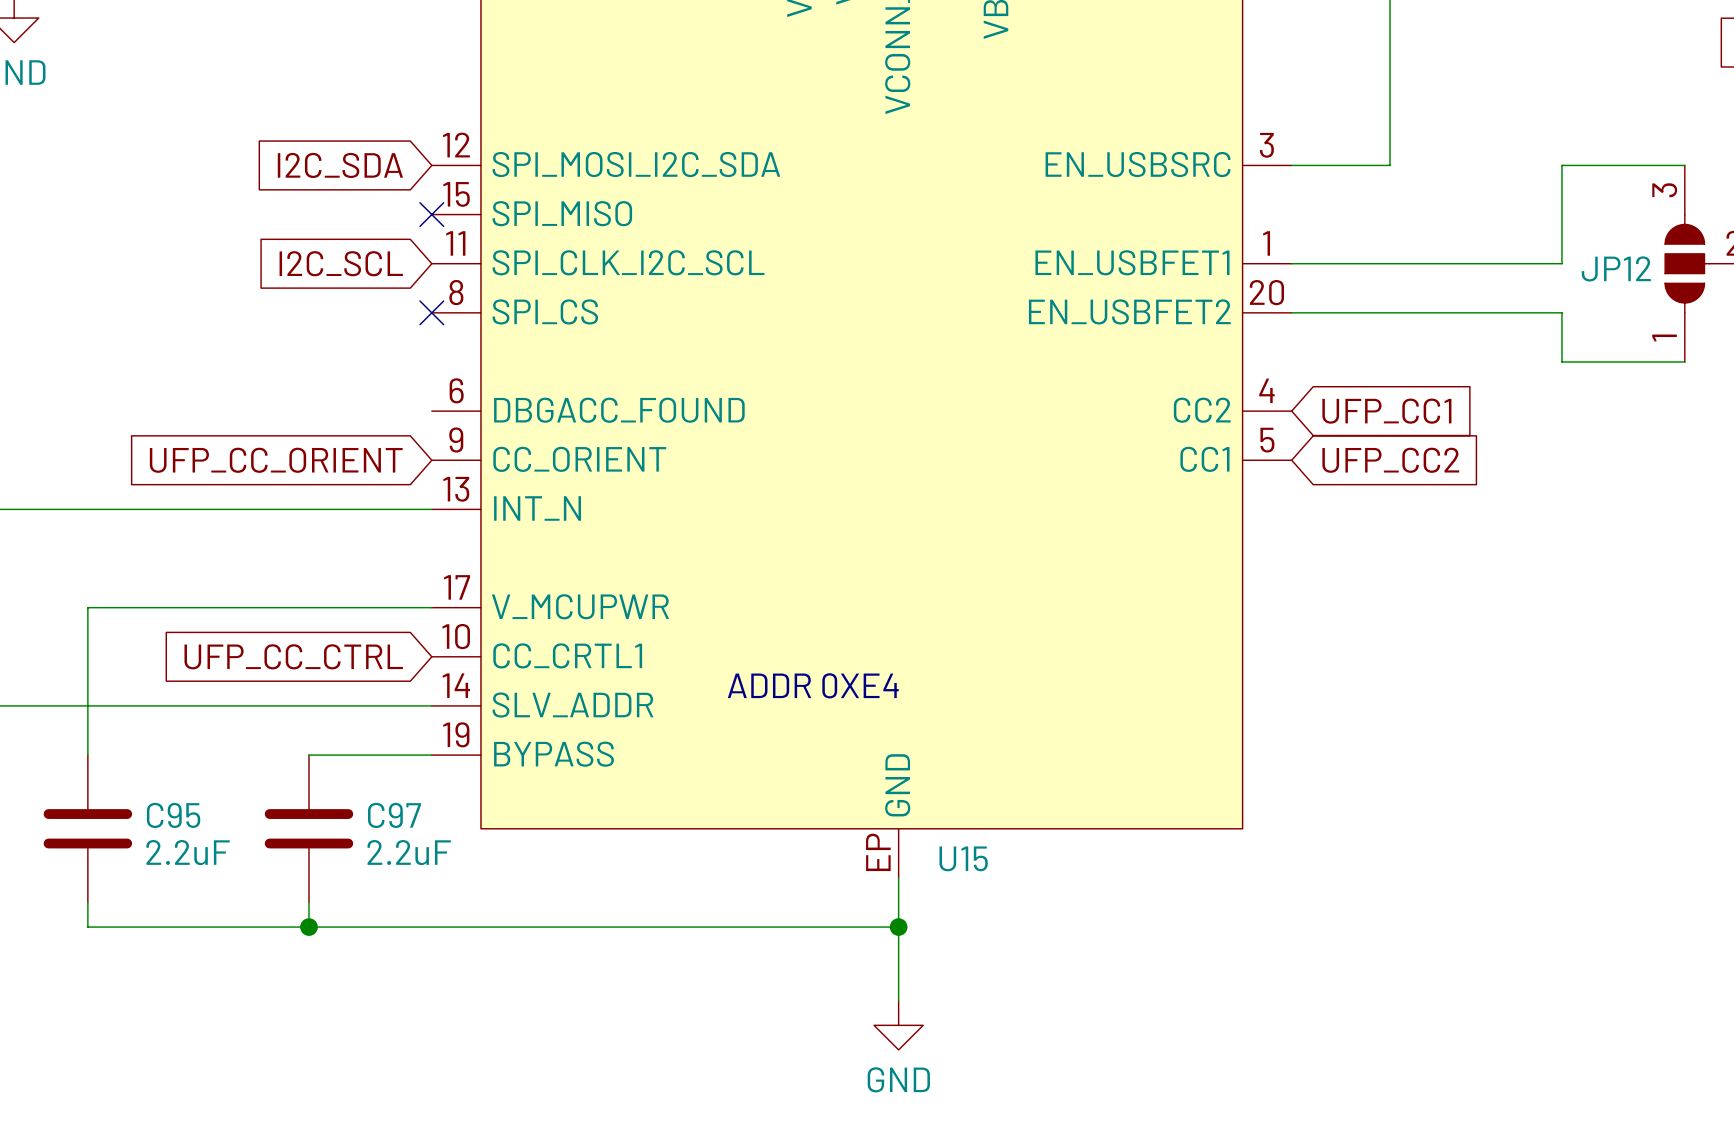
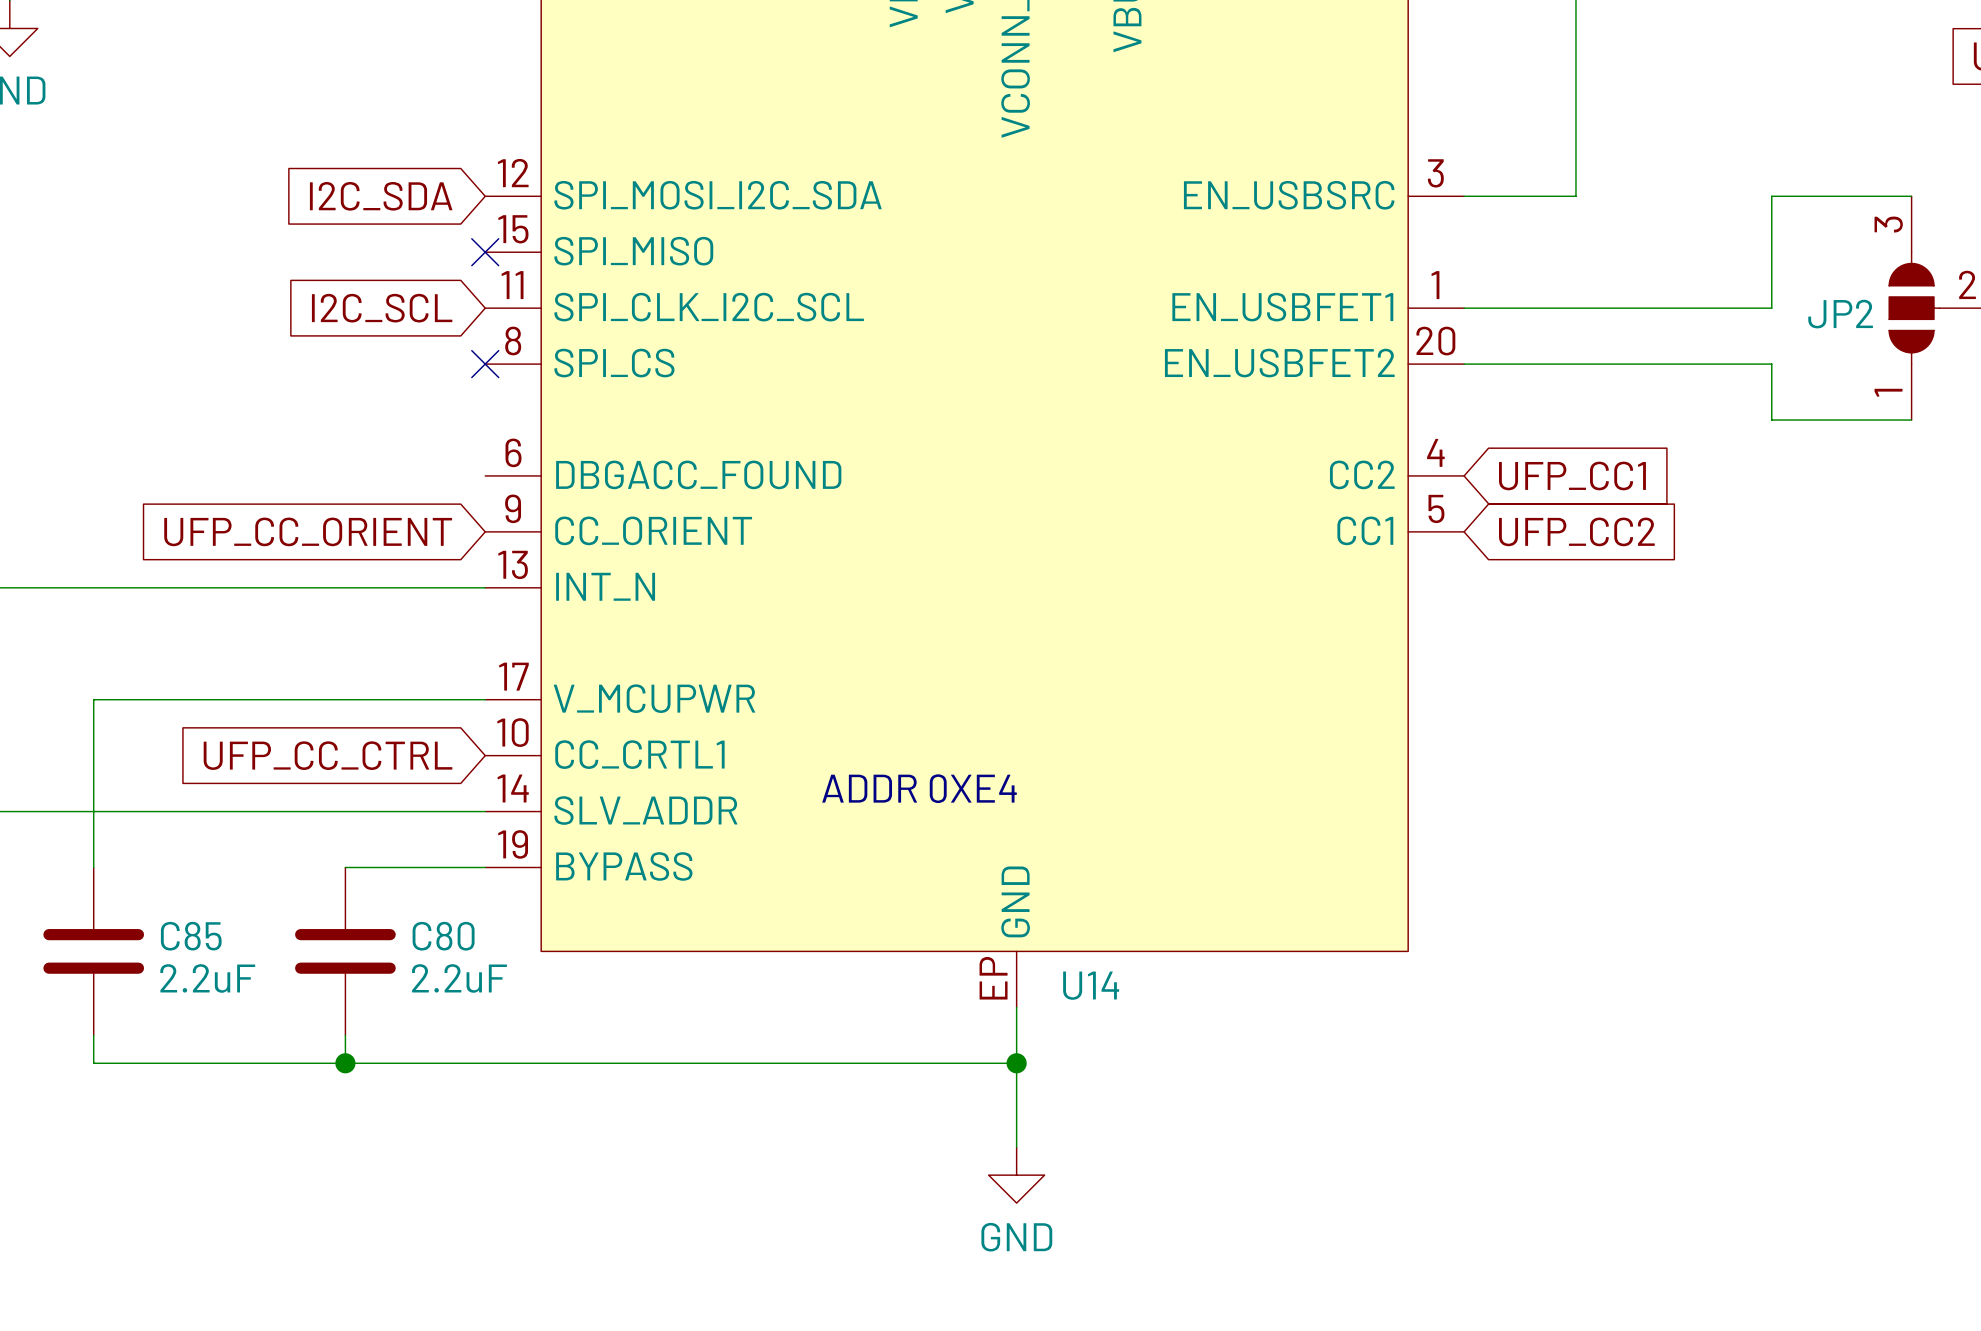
JP12 name: JP12 (1616, 268) -> JP2 (1840, 314)
C95 name: C95 (173, 815) -> C85 (191, 936)
C97 name: C97 (394, 815) -> C80 (443, 936)
U15 name: U15 (963, 858) -> U14 (1091, 985)

